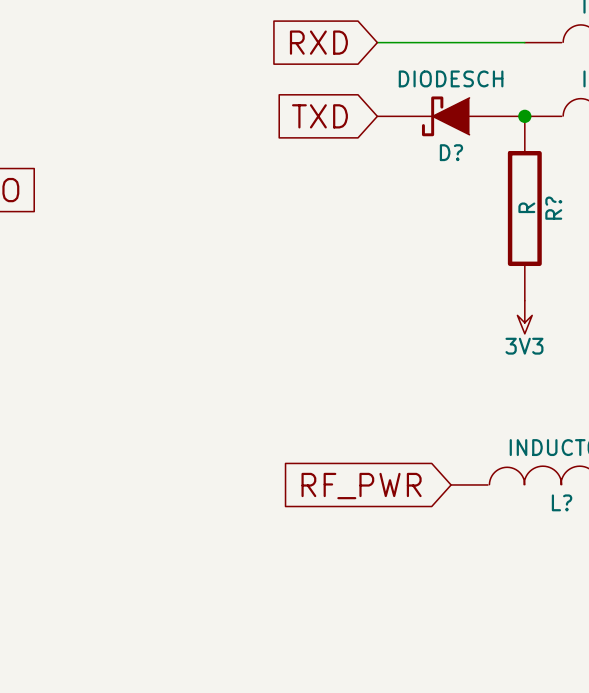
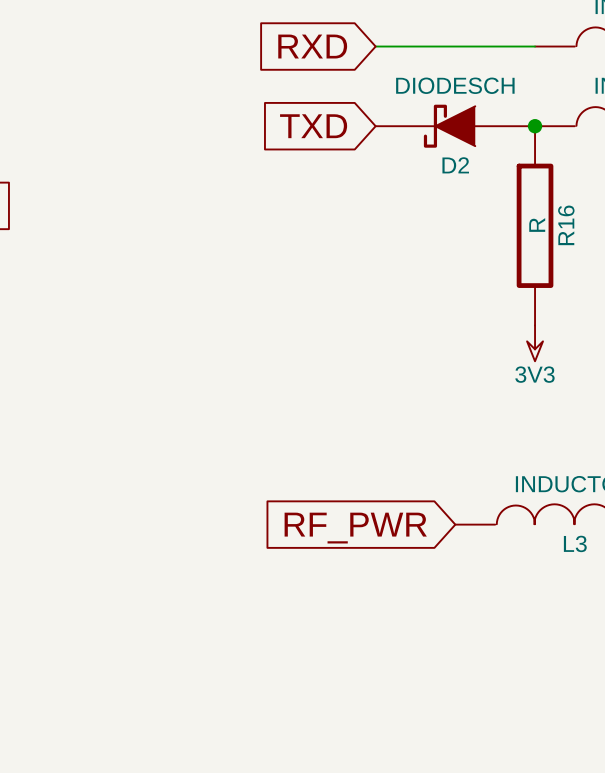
D? name: D? (451, 152) -> D2 (455, 165)
R? name: R? (553, 208) -> R16 (566, 225)
L? name: L? (562, 502) -> L3 (575, 543)

